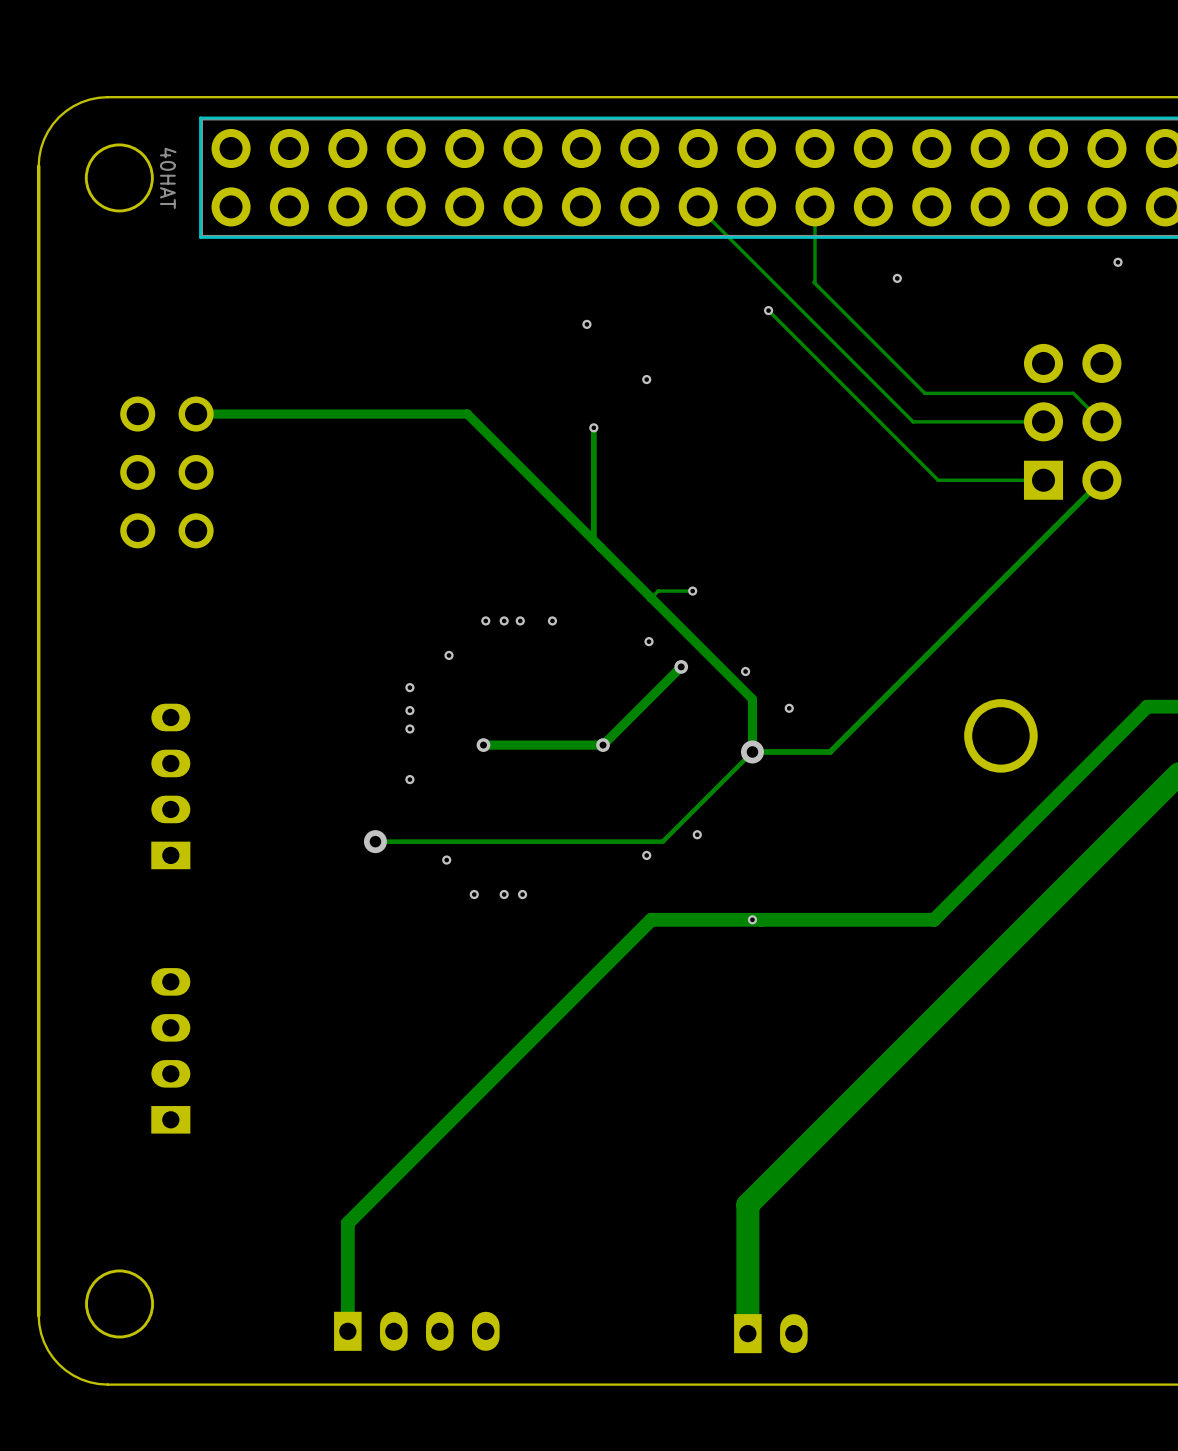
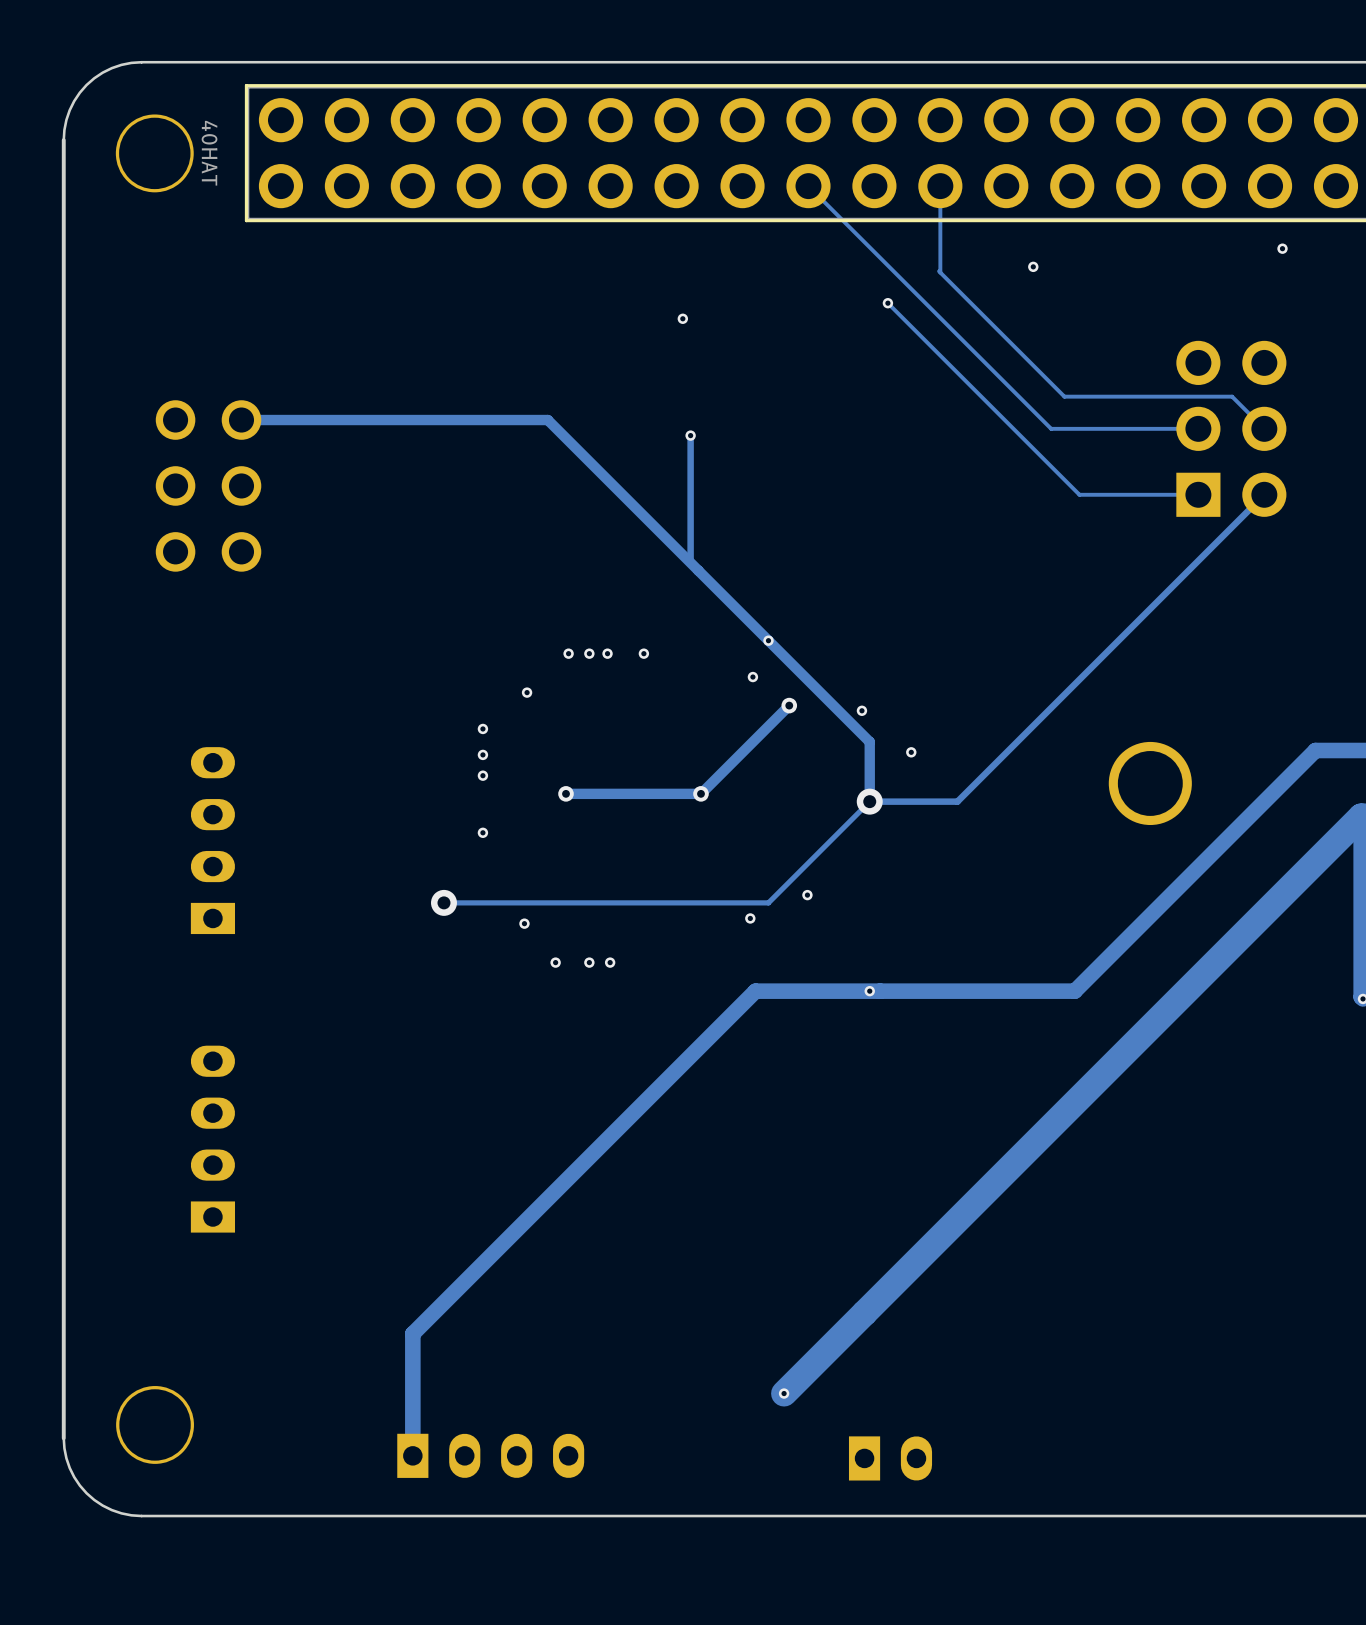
via: (646, 379) -> none
track: (692, 591) (658, 591) (651, 597) -> none
via position: (692, 591) -> (768, 640)
track: (747, 1204) (747, 1333) -> (864, 1313) (784, 1393)
via: none -> (784, 1393)

